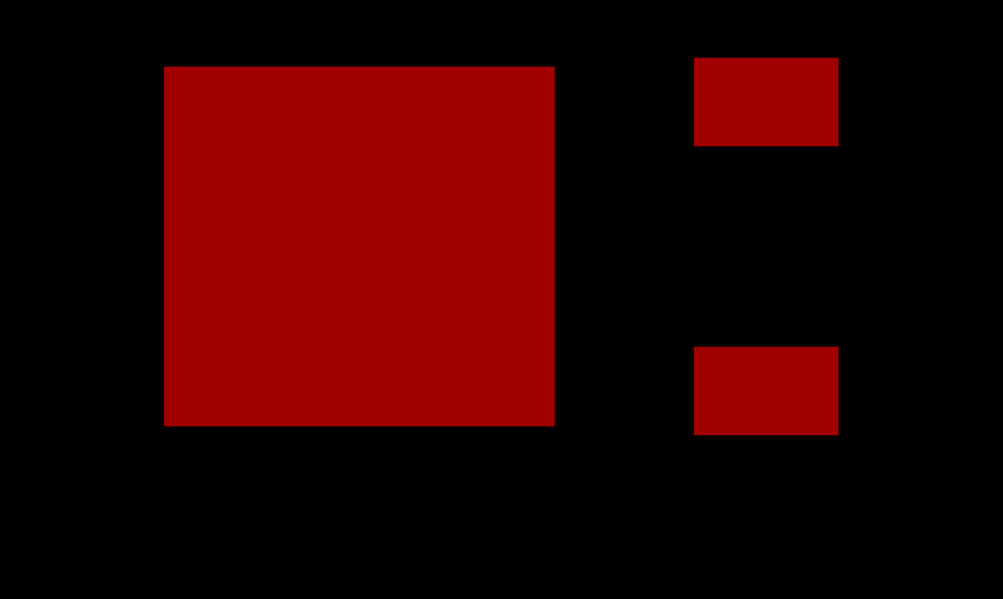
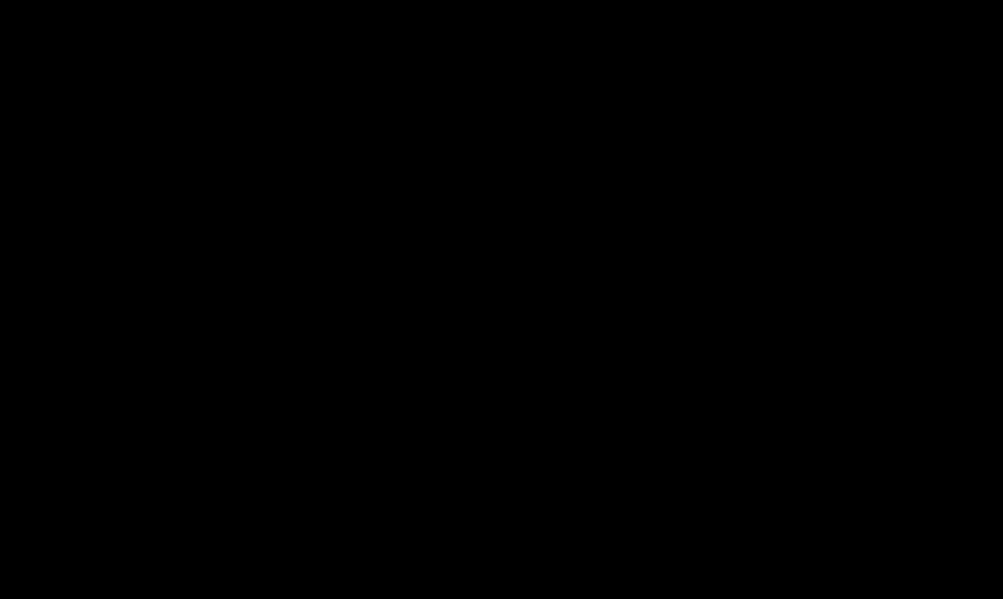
part: (501, 246) -> none

